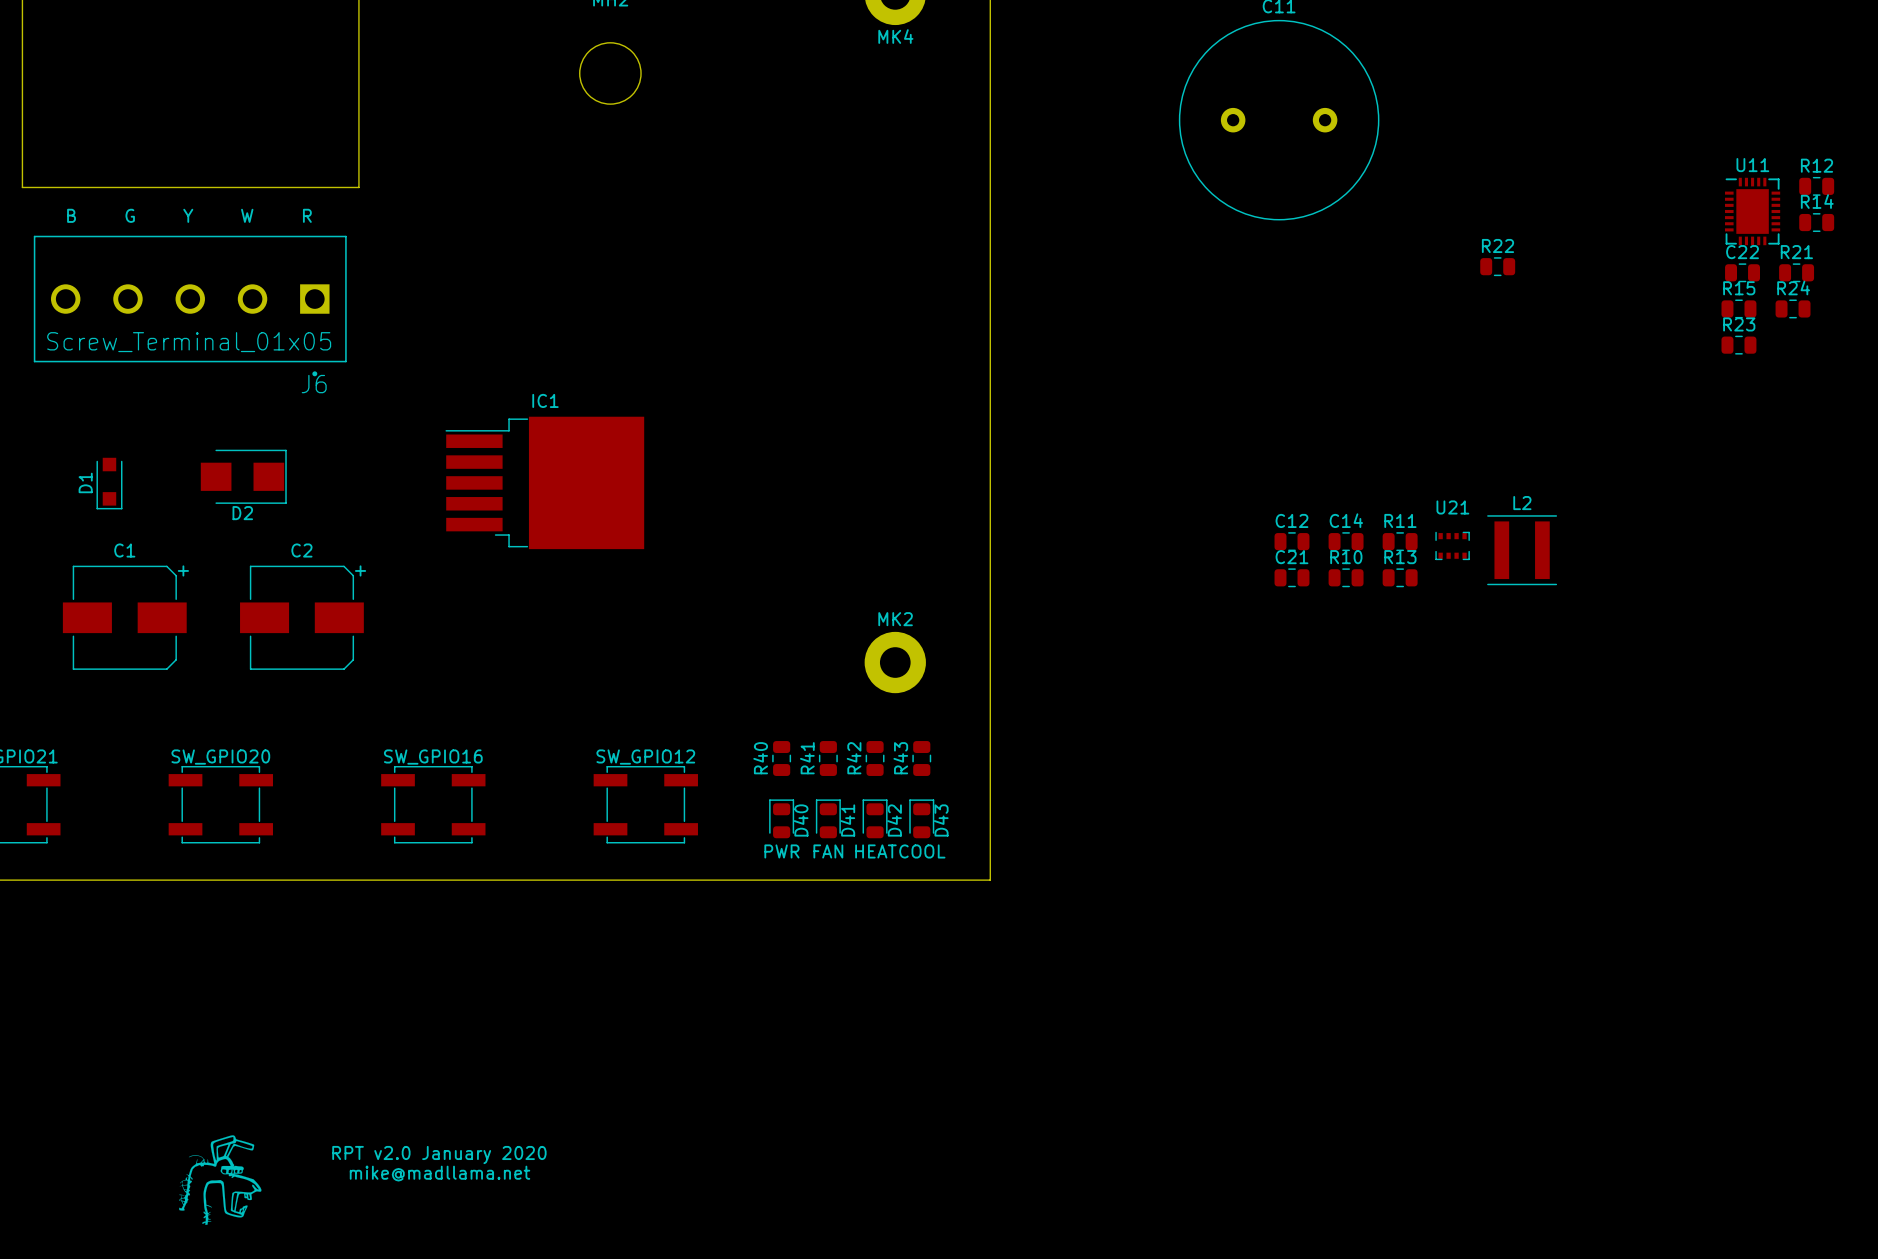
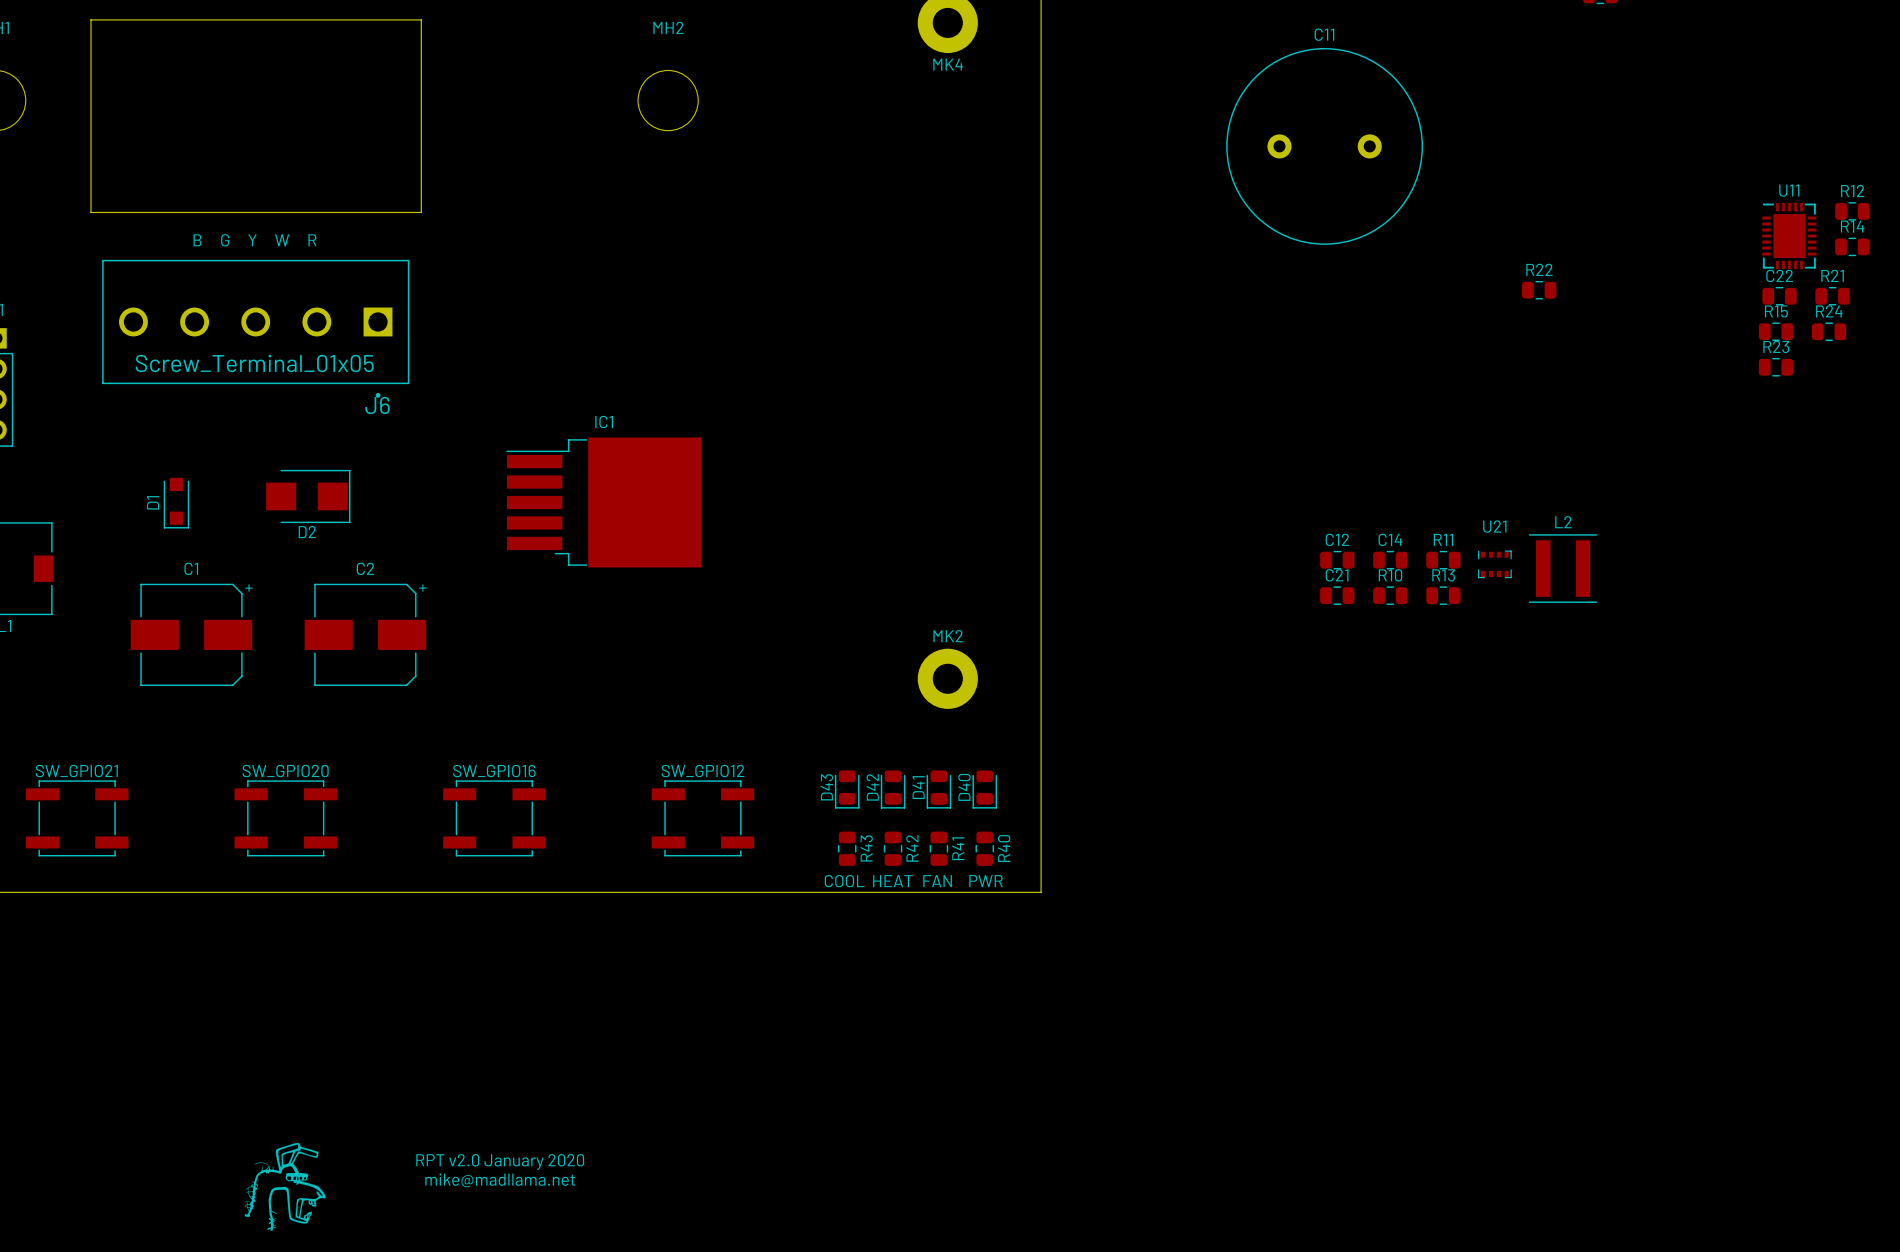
R40 name position: R40 (760, 758) -> R40 (1004, 848)
R40 position: (781, 758) -> (984, 848)
R41 name position: R41 (807, 758) -> R41 (958, 848)
R41 position: (828, 758) -> (938, 848)
R42 name position: R42 (854, 758) -> R42 (912, 848)
R42 position: (875, 758) -> (893, 848)
R43 name position: R43 (900, 758) -> R43 (866, 848)
R43 position: (921, 758) -> (847, 848)
D40 rotation: 0° (781, 818) -> 180° (984, 789)
D40 position: (781, 818) -> (984, 789)
D41 rotation: 0° (828, 818) -> 180° (938, 789)
D41 position: (828, 818) -> (938, 789)
D42 rotation: 0° (875, 818) -> 180° (893, 789)
D42 position: (875, 818) -> (893, 789)
D43 rotation: 0° (921, 818) -> 180° (847, 789)
D43 position: (921, 818) -> (847, 789)
text position: PWR (781, 851) -> PWR (986, 881)
text position: FAN (828, 851) -> FAN (937, 881)
text position: HEAT (875, 851) -> HEAT (892, 881)
text position: COOL (922, 851) -> COOL (844, 881)

